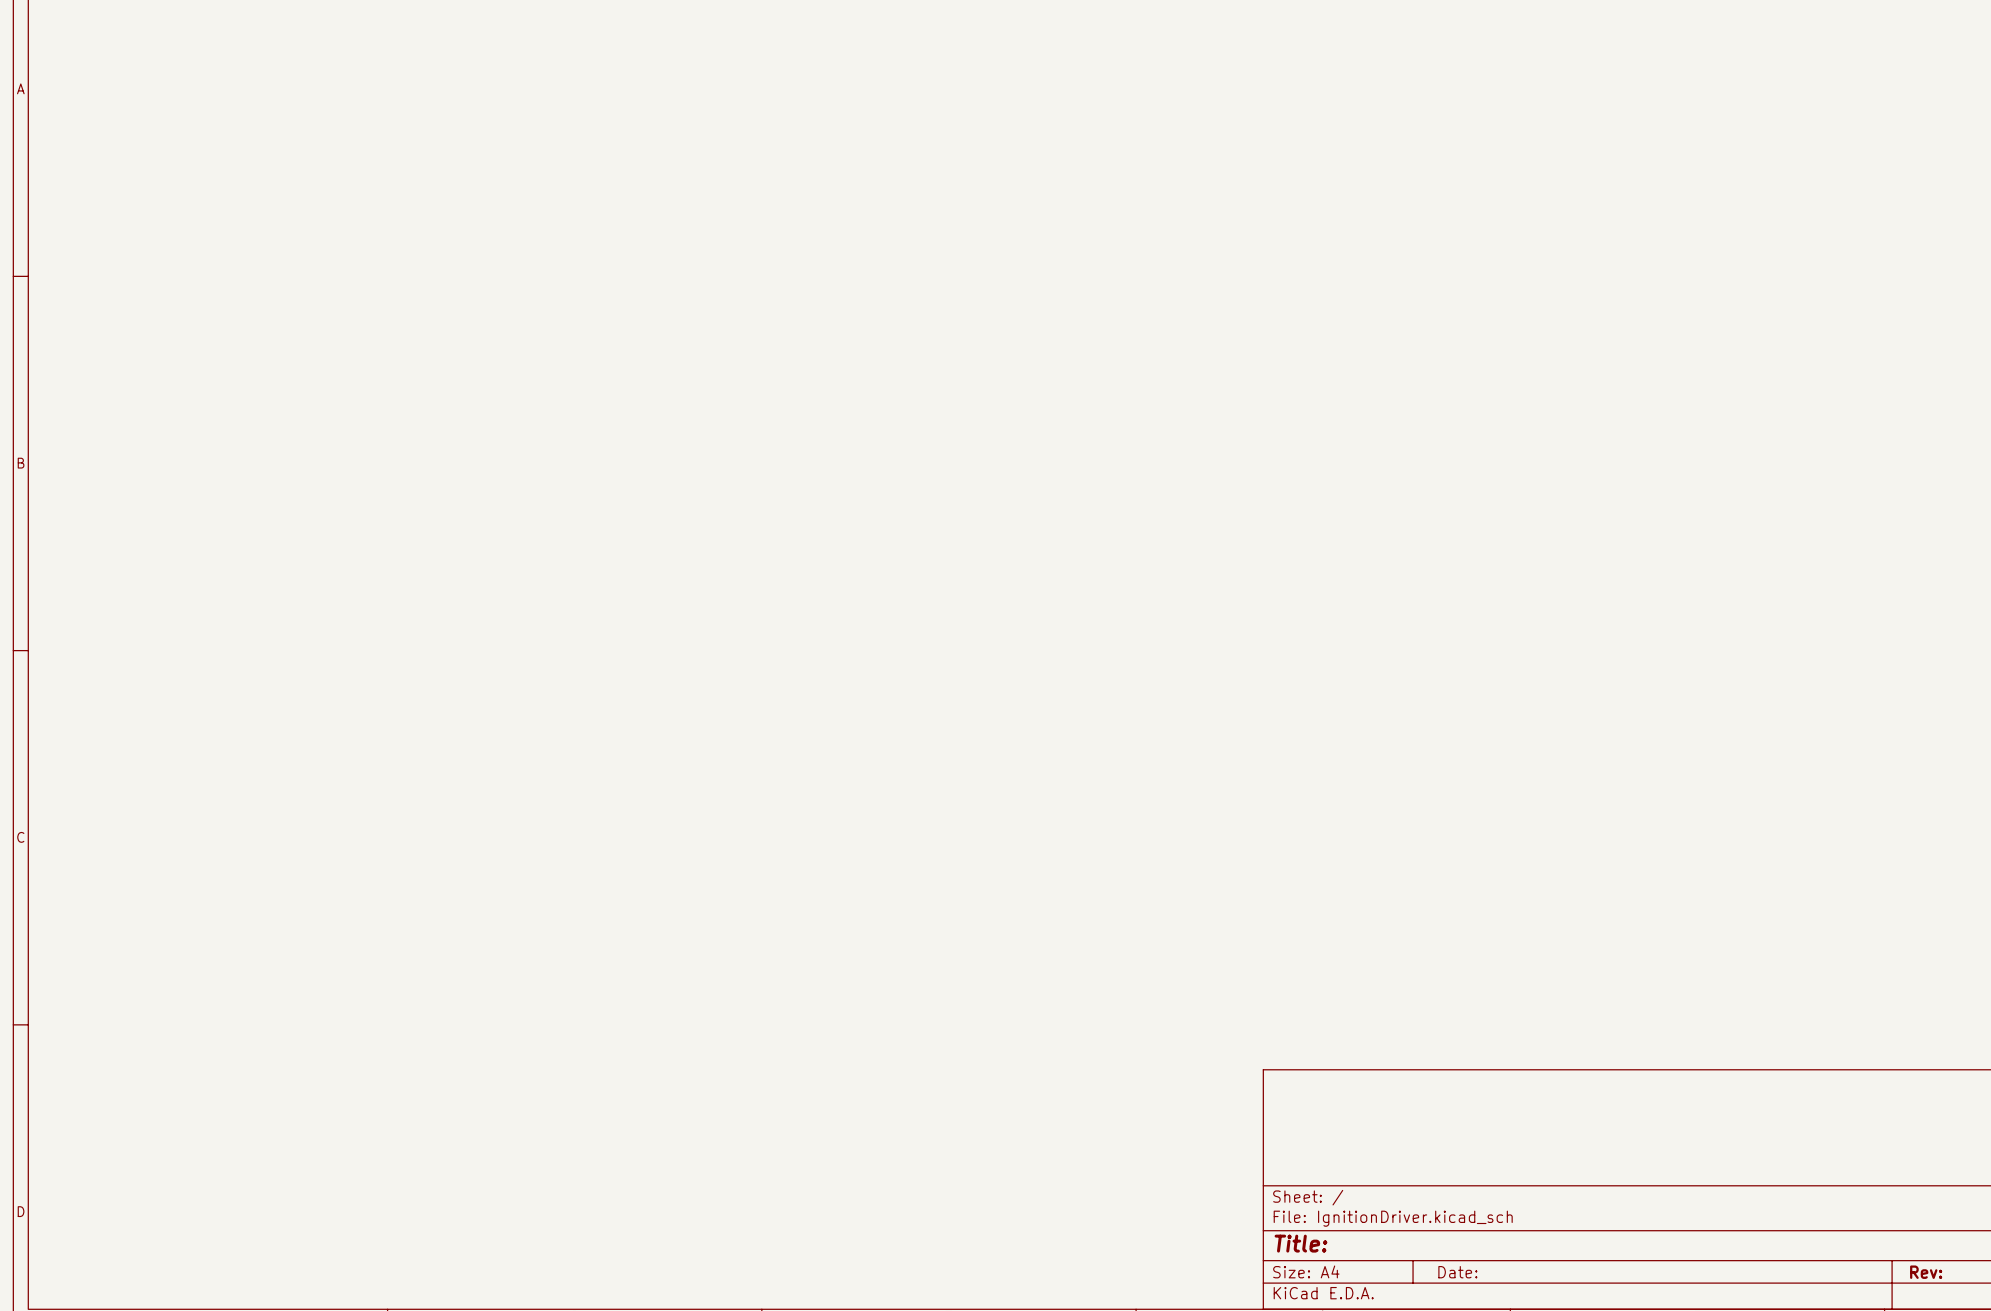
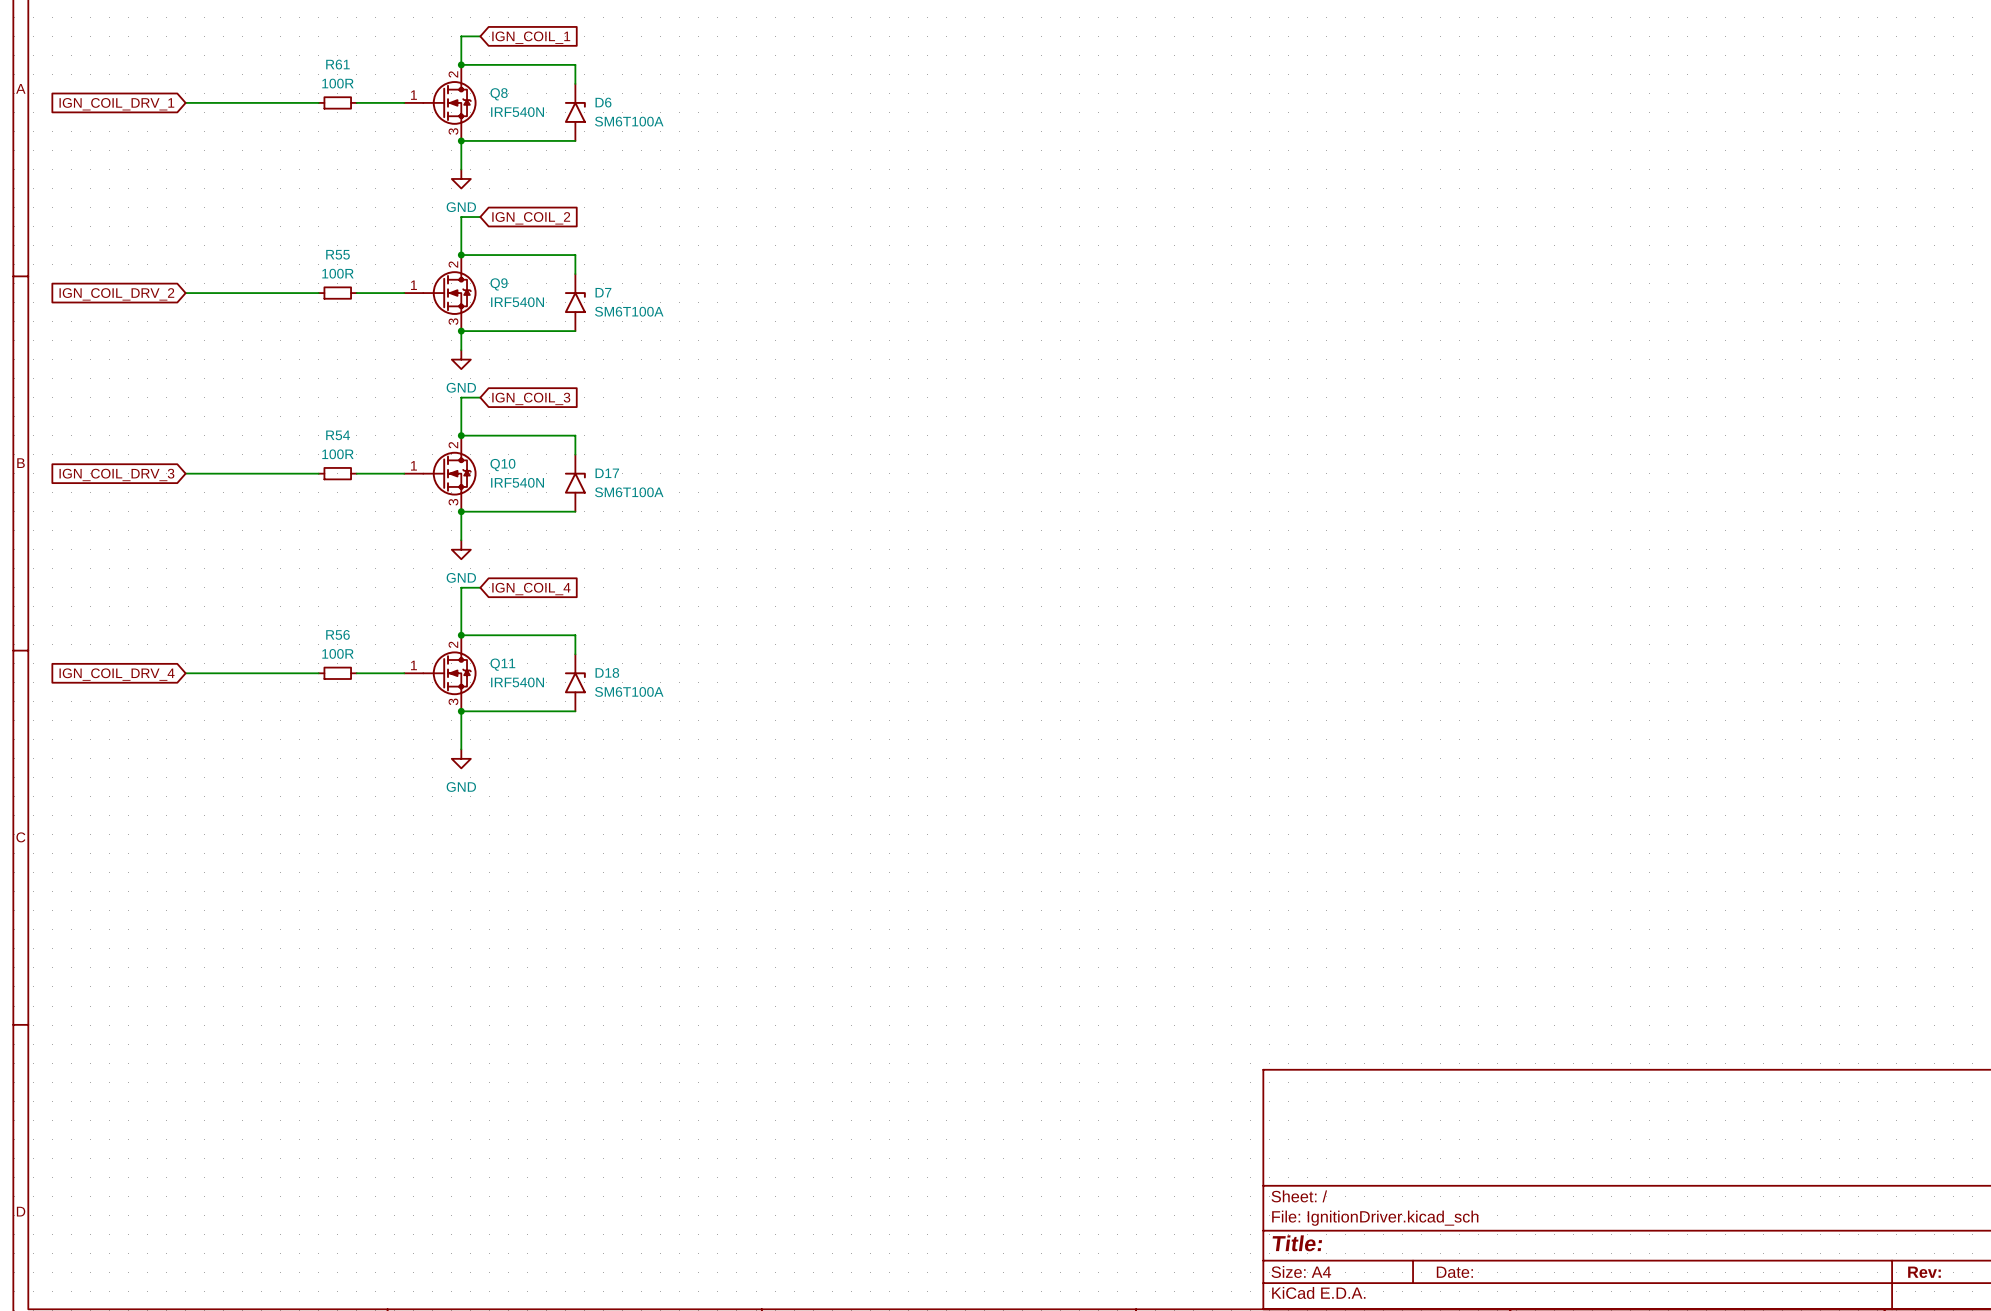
wire: none -> (480, 36) (461, 36) (461, 64) (575, 64) (575, 83)
global label: none -> IGN_COIL_1 (531, 37)
junction: none -> (461, 64)
wire: none -> (185, 102) (318, 102)
R61: none -> 100R (337, 102)
wire: none -> (356, 102) (404, 102)
Q8: none -> IRF540N (440, 102)
global label: none -> IGN_COIL_DRV_1 (116, 104)
D6: none -> SM6T100A (575, 112)
junction: none -> (461, 140)
wire: none -> (575, 140) (461, 140) (461, 169)
power symbol: none -> GND (461, 178)
wire: none -> (480, 217) (461, 217) (461, 255) (575, 255) (575, 274)
global label: none -> IGN_COIL_2 (531, 218)
junction: none -> (461, 255)
global label: none -> IGN_COIL_DRV_2 (116, 294)
wire: none -> (185, 293) (318, 293)
R55: none -> 100R (337, 293)
wire: none -> (356, 293) (404, 293)
Q9: none -> IRF540N (440, 293)
D7: none -> SM6T100A (575, 302)
junction: none -> (461, 331)
wire: none -> (575, 331) (461, 331) (461, 350)
power symbol: none -> GND (461, 359)
wire: none -> (480, 397) (461, 397) (461, 435) (575, 435) (575, 454)
global label: none -> IGN_COIL_3 (531, 398)
junction: none -> (461, 435)
wire: none -> (185, 473) (318, 473)
R54: none -> 100R (337, 473)
wire: none -> (356, 473) (404, 473)
Q10: none -> IRF540N (440, 473)
global label: none -> IGN_COIL_DRV_3 (116, 474)
D17: none -> SM6T100A (575, 483)
junction: none -> (461, 511)
wire: none -> (575, 511) (461, 511) (461, 540)
power symbol: none -> GND (461, 549)
wire: none -> (480, 587) (461, 587) (461, 635) (575, 635) (575, 654)
global label: none -> IGN_COIL_4 (531, 589)
junction: none -> (461, 635)
global label: none -> IGN_COIL_DRV_4 (117, 674)
wire: none -> (185, 673) (318, 673)
R56: none -> 100R (337, 673)
wire: none -> (356, 673) (404, 673)
Q11: none -> IRF540N (440, 673)
D18: none -> SM6T100A (575, 682)
junction: none -> (461, 711)
wire: none -> (575, 711) (461, 711) (461, 749)
power symbol: none -> GND (461, 758)

